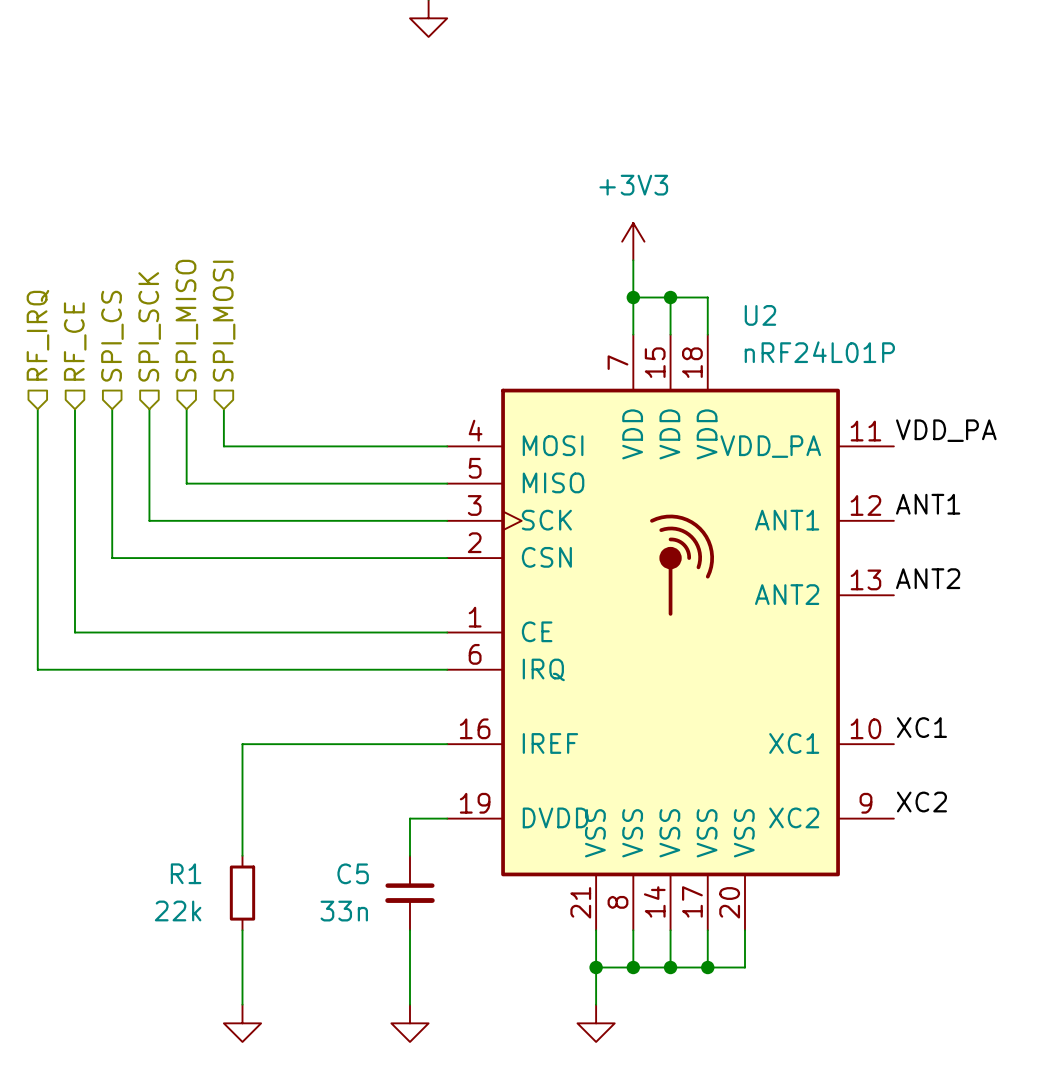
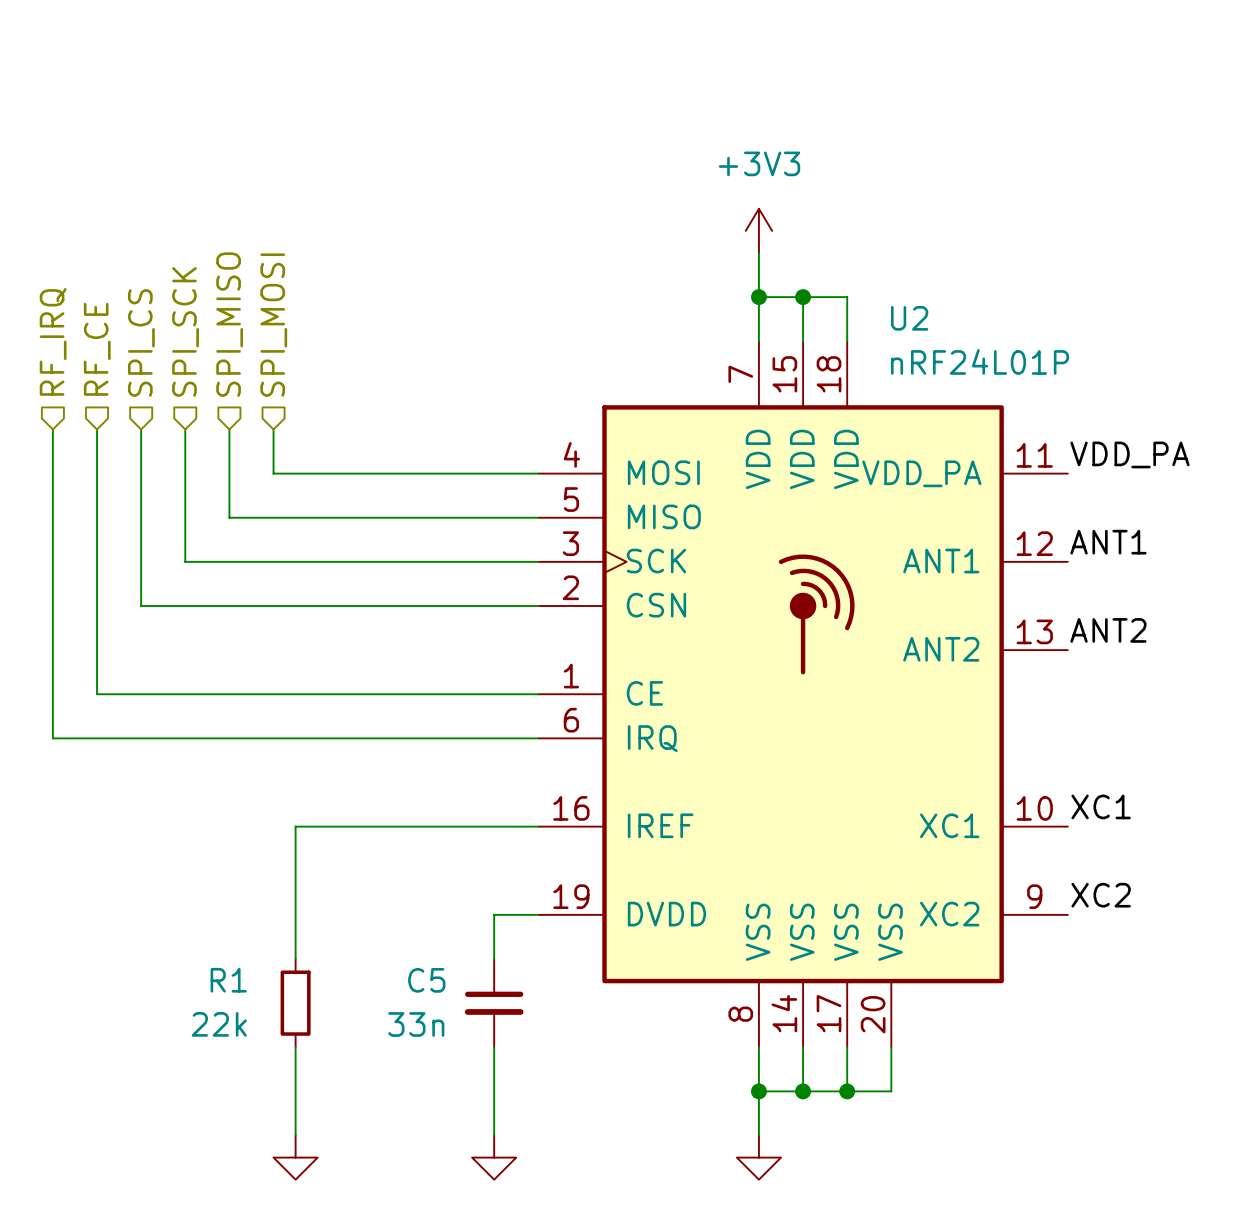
U2 symbol: [447, 334, 894, 931] -> [538, 341, 1068, 1048]
wire: (596, 930) (596, 1004) -> none
wire: (596, 967) (633, 967) -> (758, 1135) (758, 1091)
junction: (596, 967) -> none
power symbol position: (596, 1023) -> (758, 1157)

